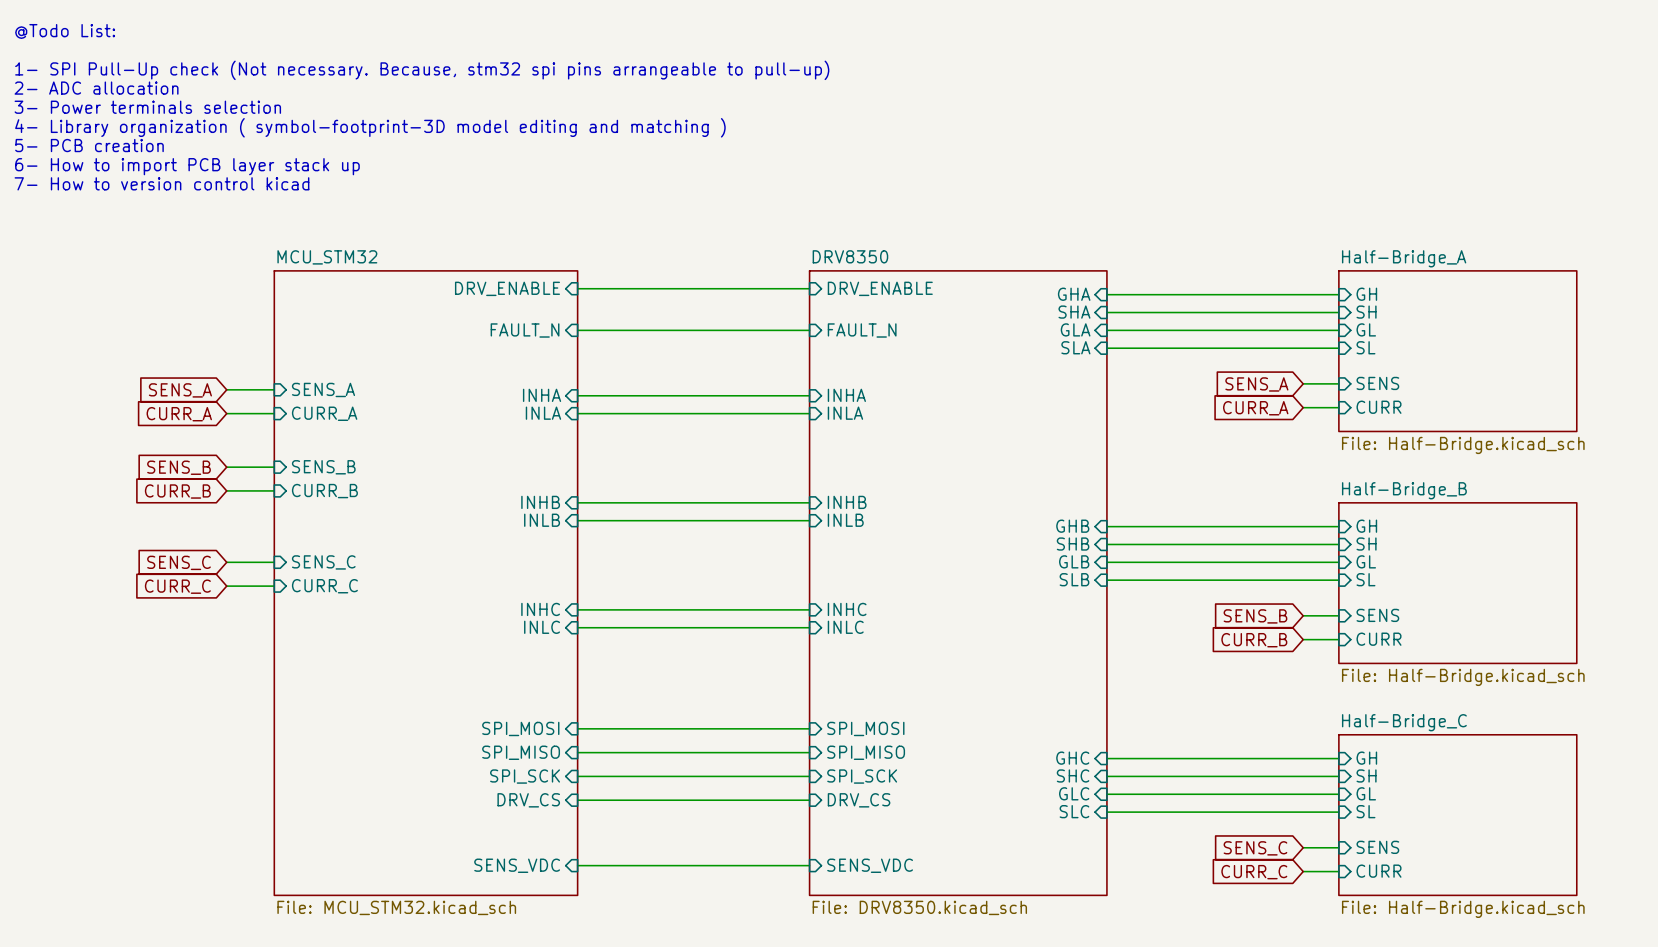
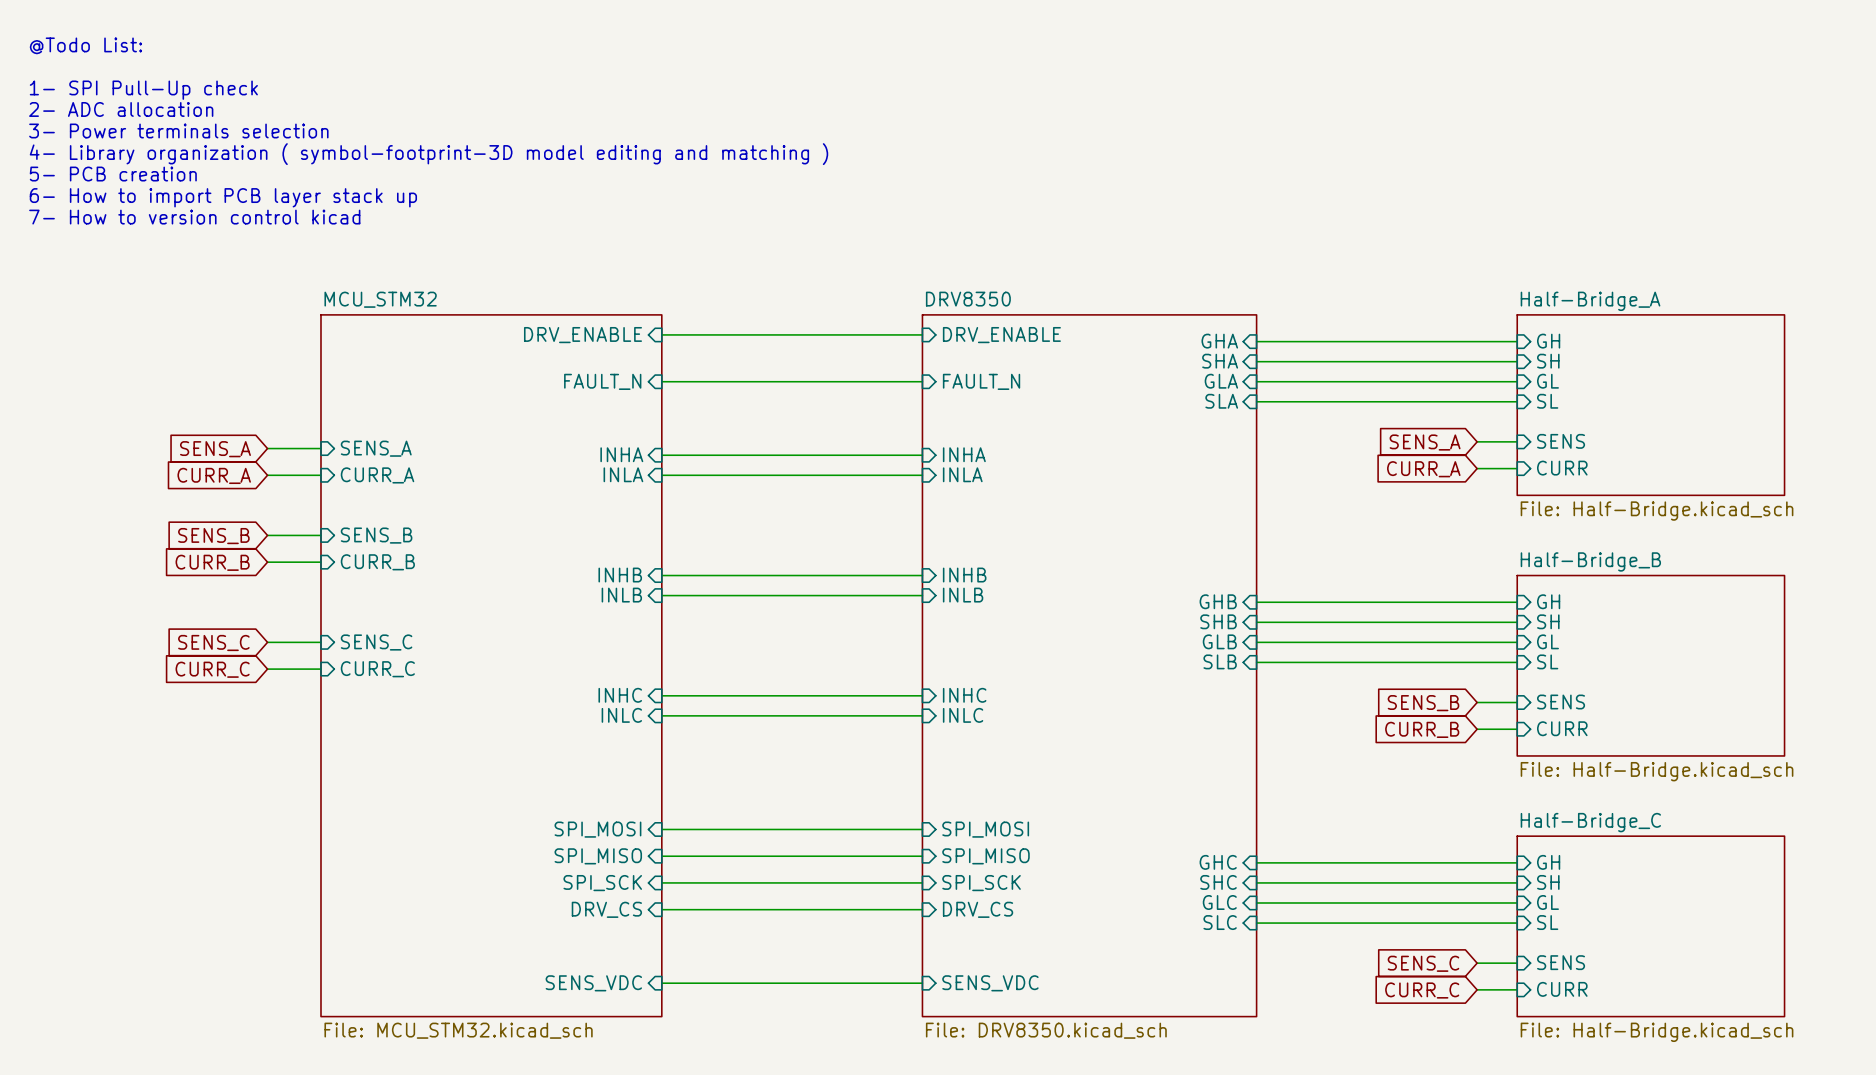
text: 1- SPI Pull-Up check (Not necessary. Because, stm32 spi pins arrangeable to pull-up) (422, 70) -> 1- SPI Pull-Up check (143, 90)

